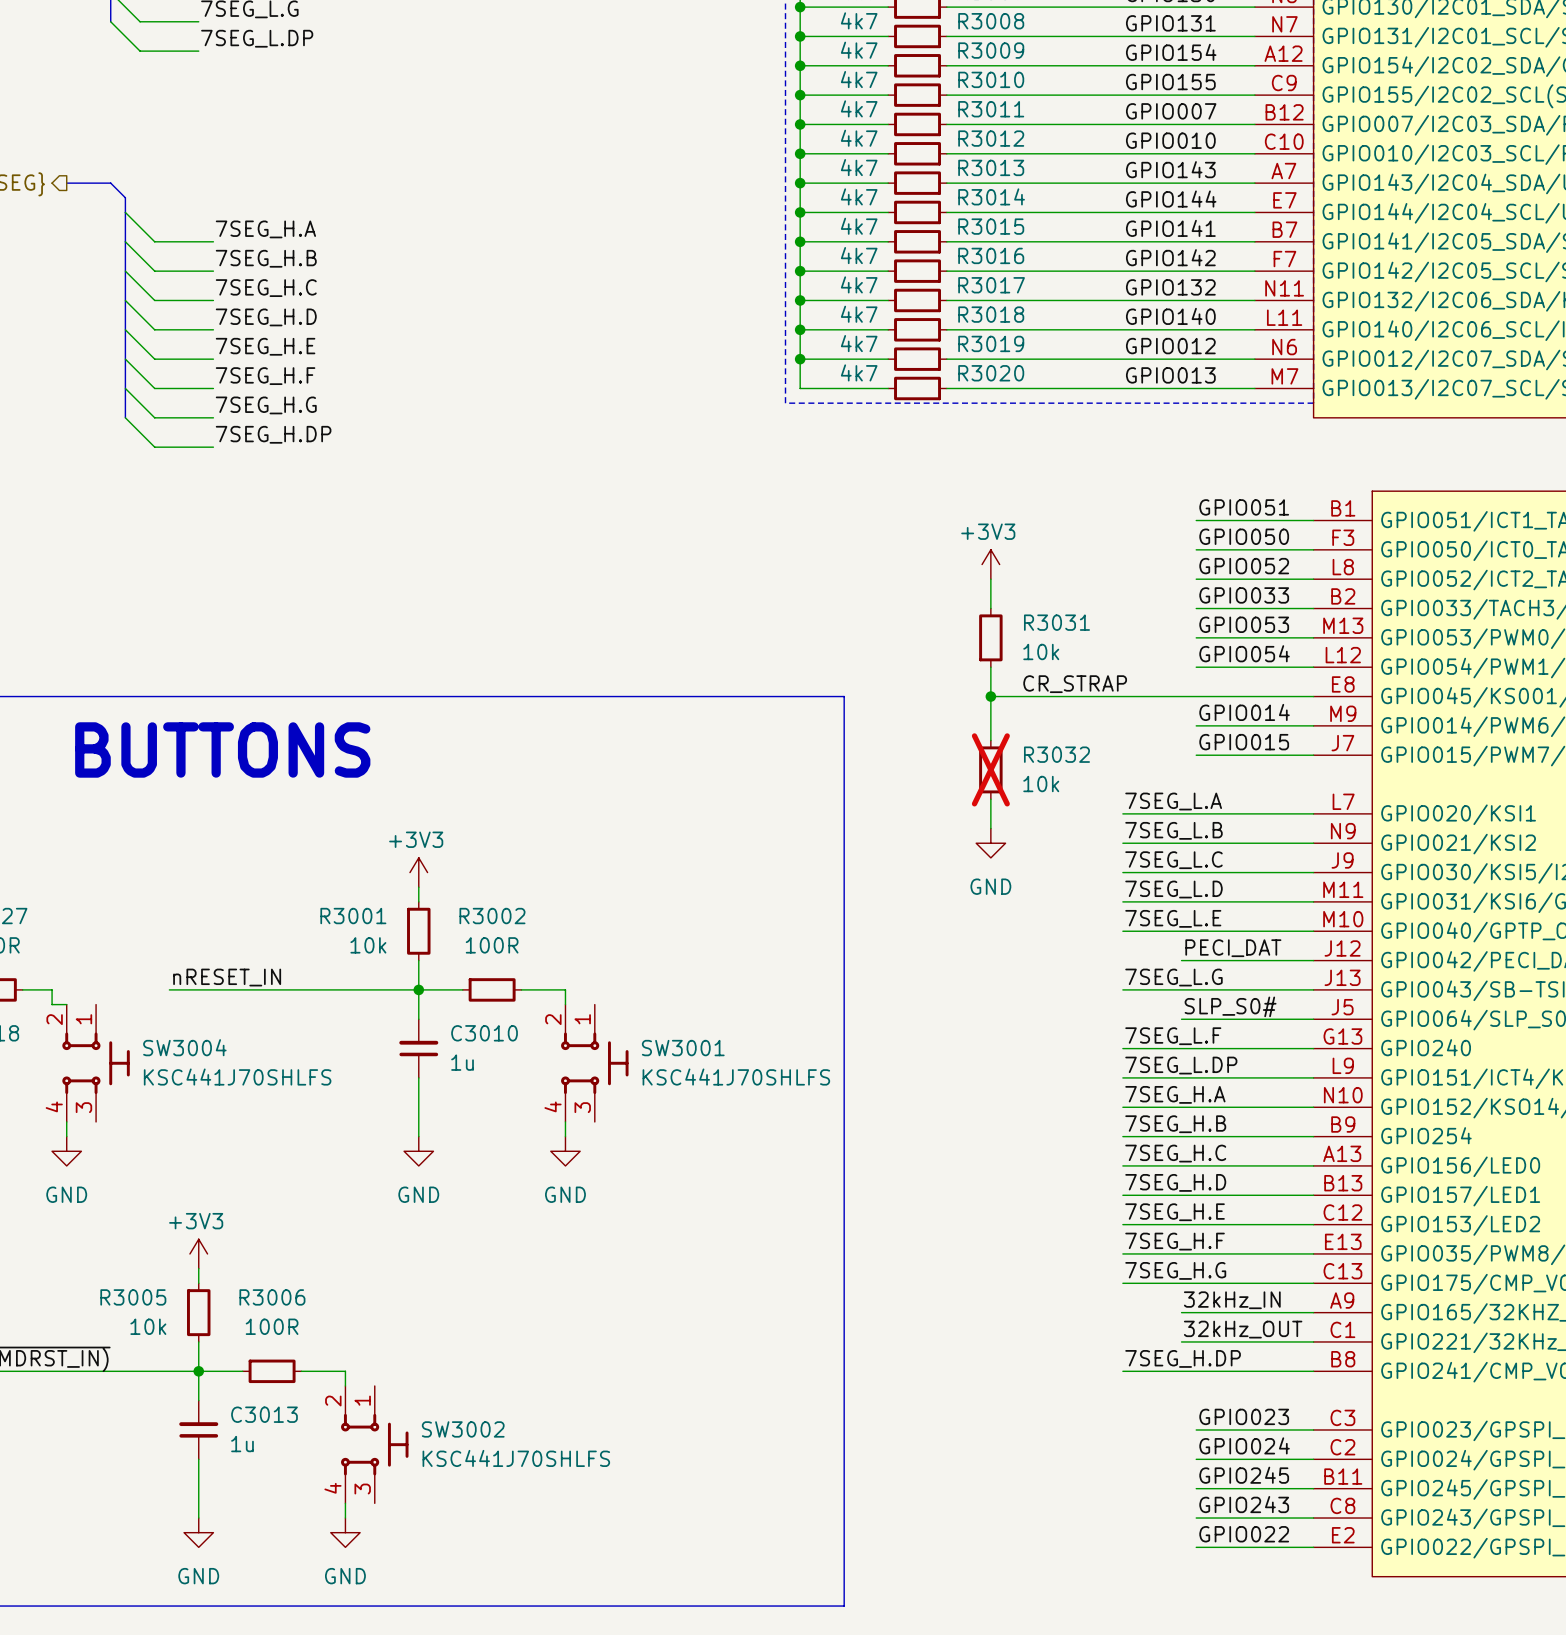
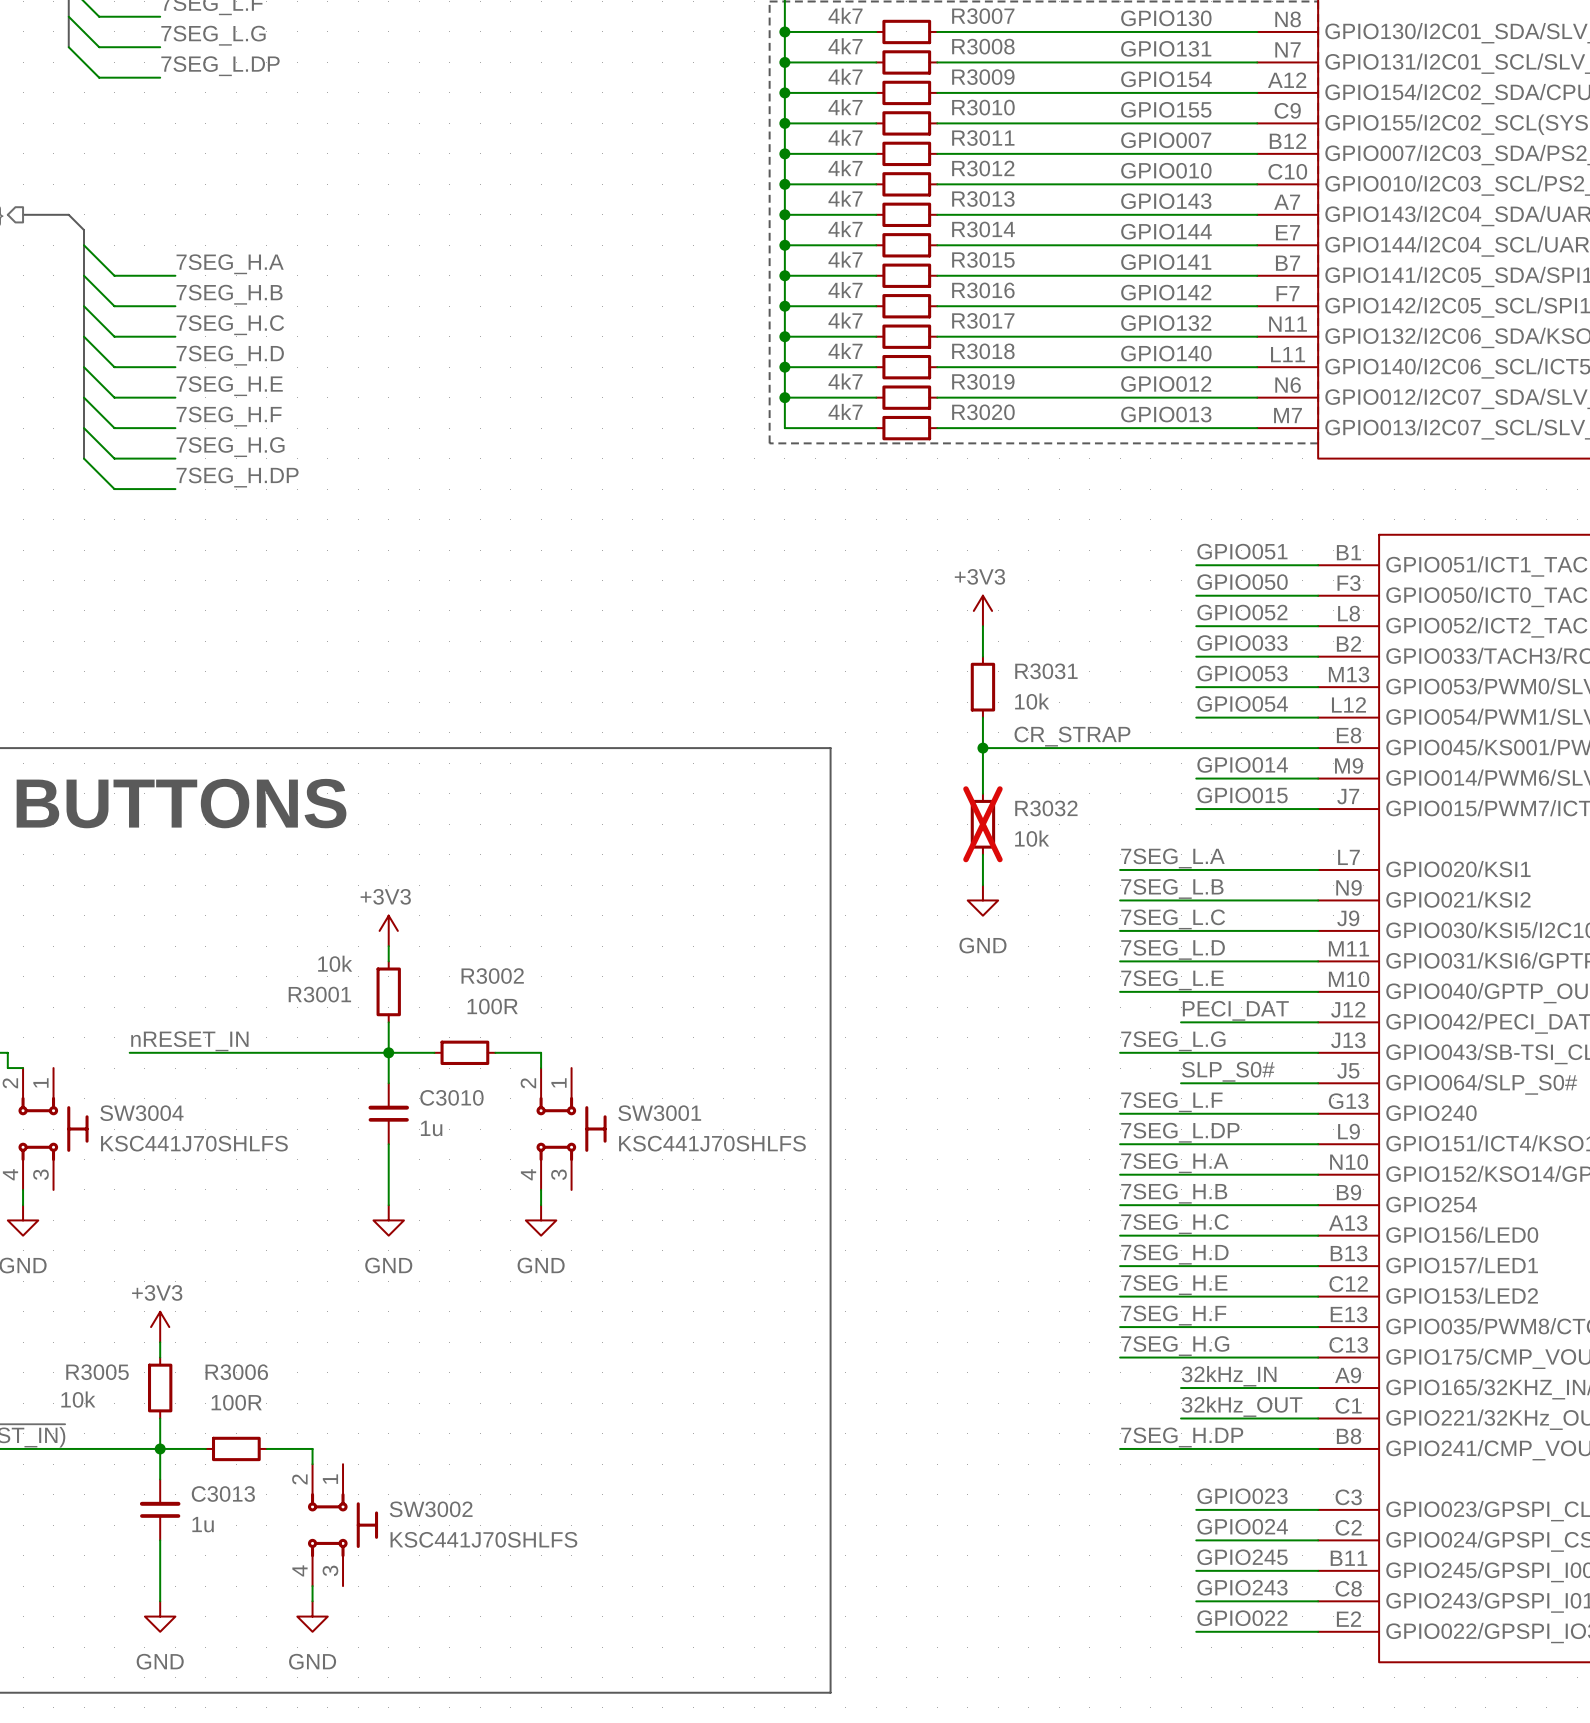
R3001 name position: R3001 (353, 916) -> R3001 (319, 994)
R3002 name position: R3002 (492, 916) -> R3002 (492, 976)
R3001 text position: 10k (368, 945) -> 10k (335, 963)
R3002 text position: 100R (492, 945) -> 100R (492, 1006)
R3005 text position: 10k (148, 1326) -> 10k (78, 1399)

